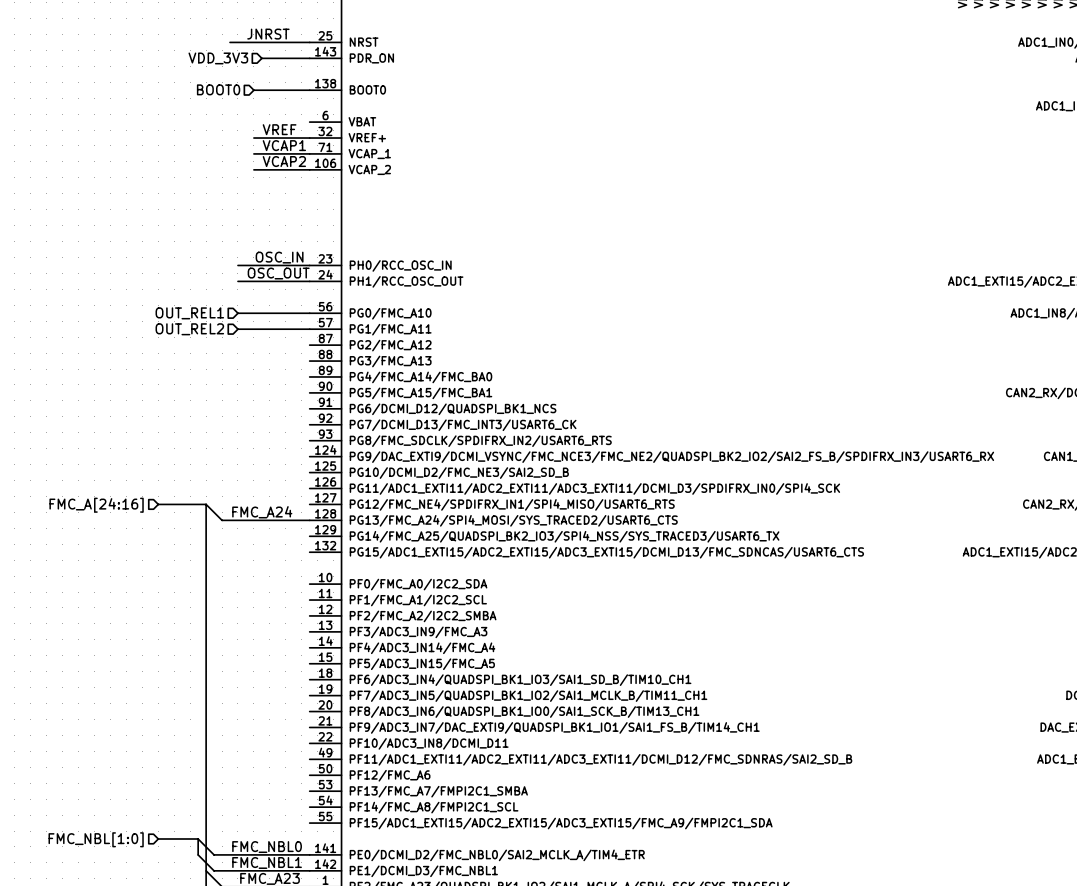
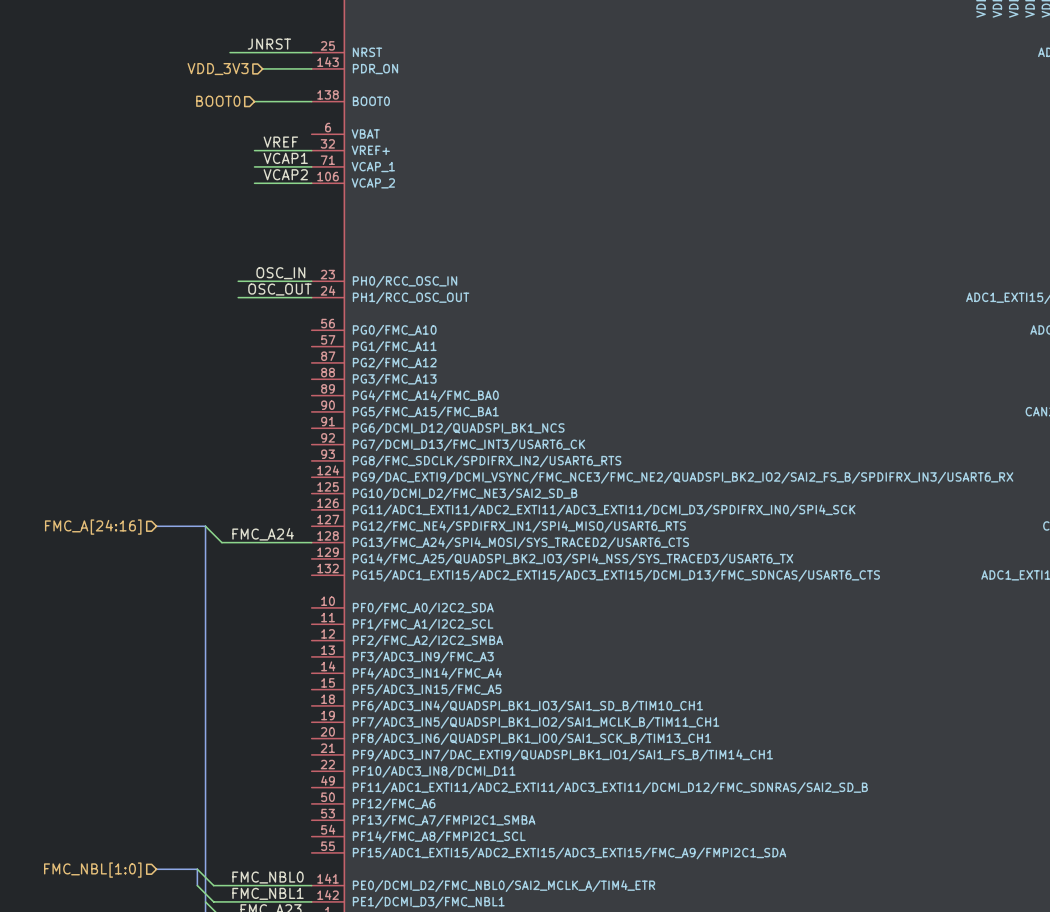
hierarchical label: OUT_REL1 (189, 313) -> none
wire: (237, 313) (309, 313) -> none
hierarchical label: OUT_REL2 (189, 329) -> none
wire: (237, 329) (309, 329) -> none

